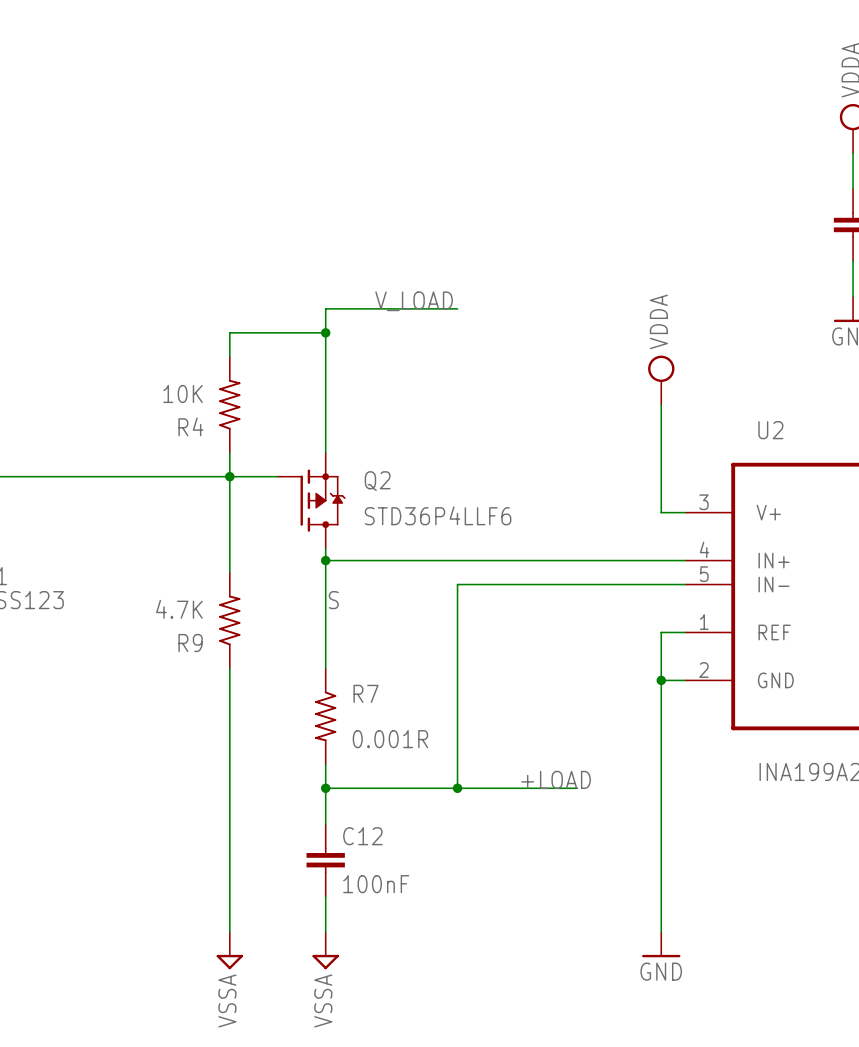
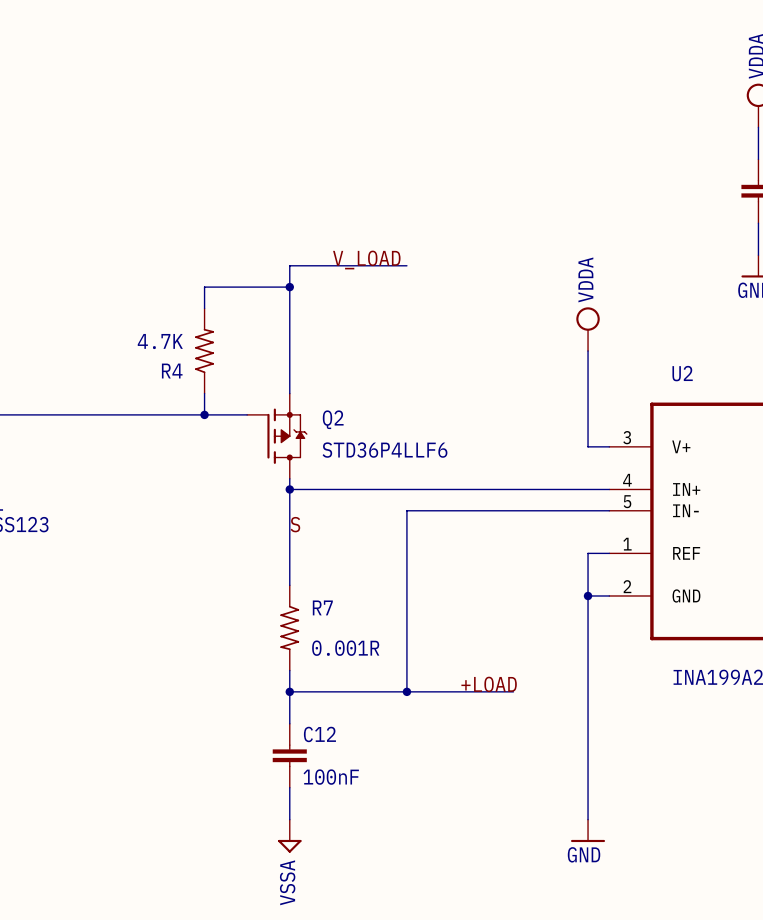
R4 value: 10K (183, 393) -> 4.7K (160, 341)
wire: (229, 476) (229, 572) -> none
R9: 4.7K (229, 620) -> none
wire: (229, 668) (229, 932) -> none
power symbol: VSSA (229, 950) -> none

